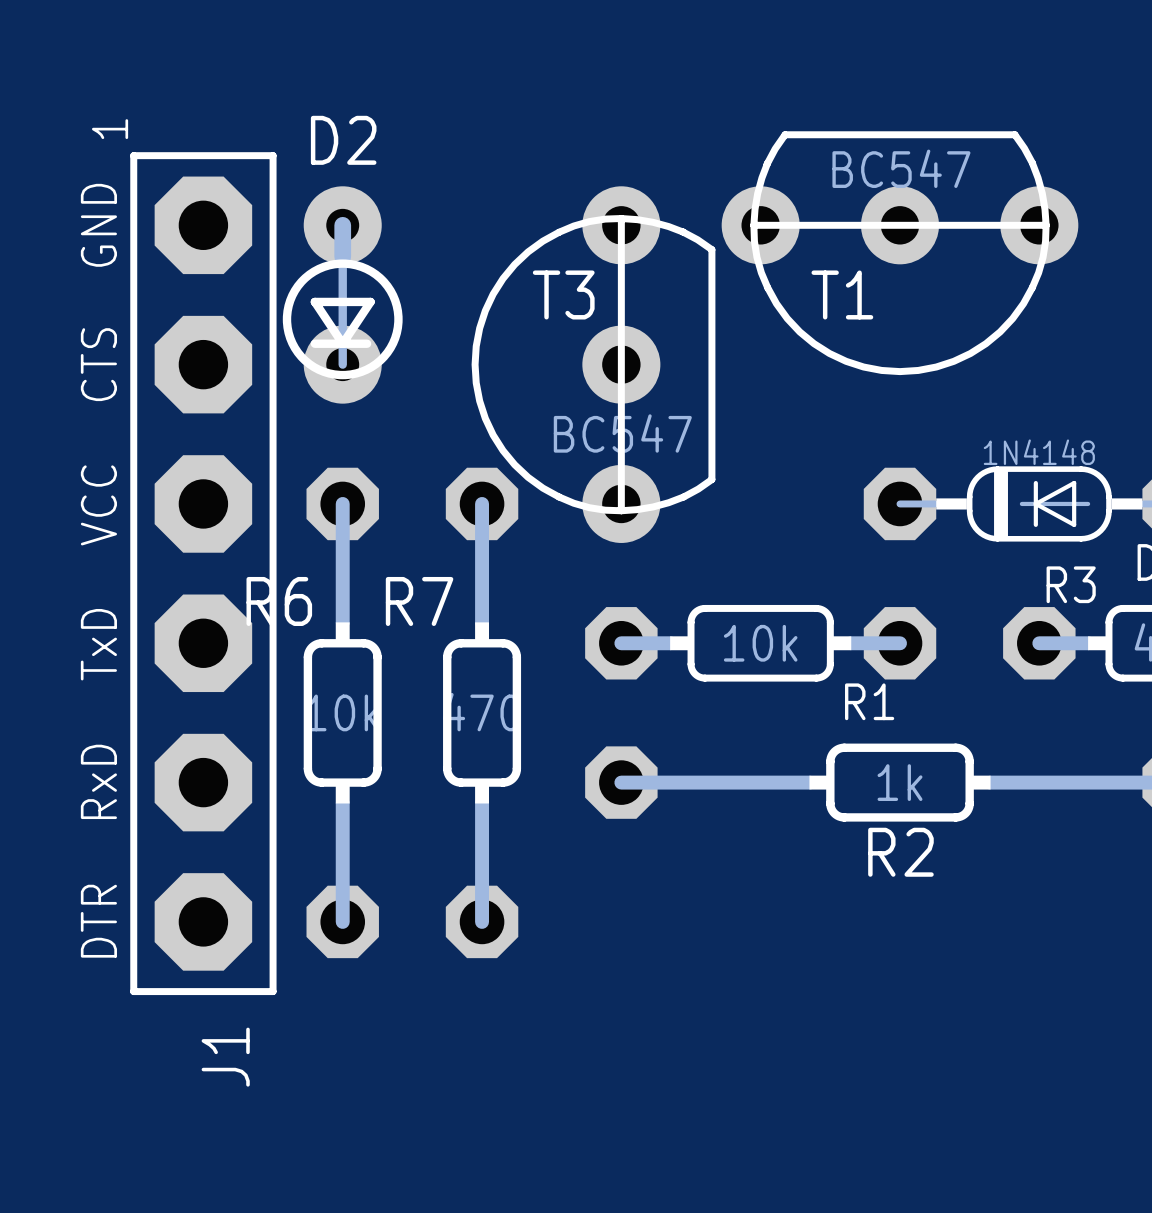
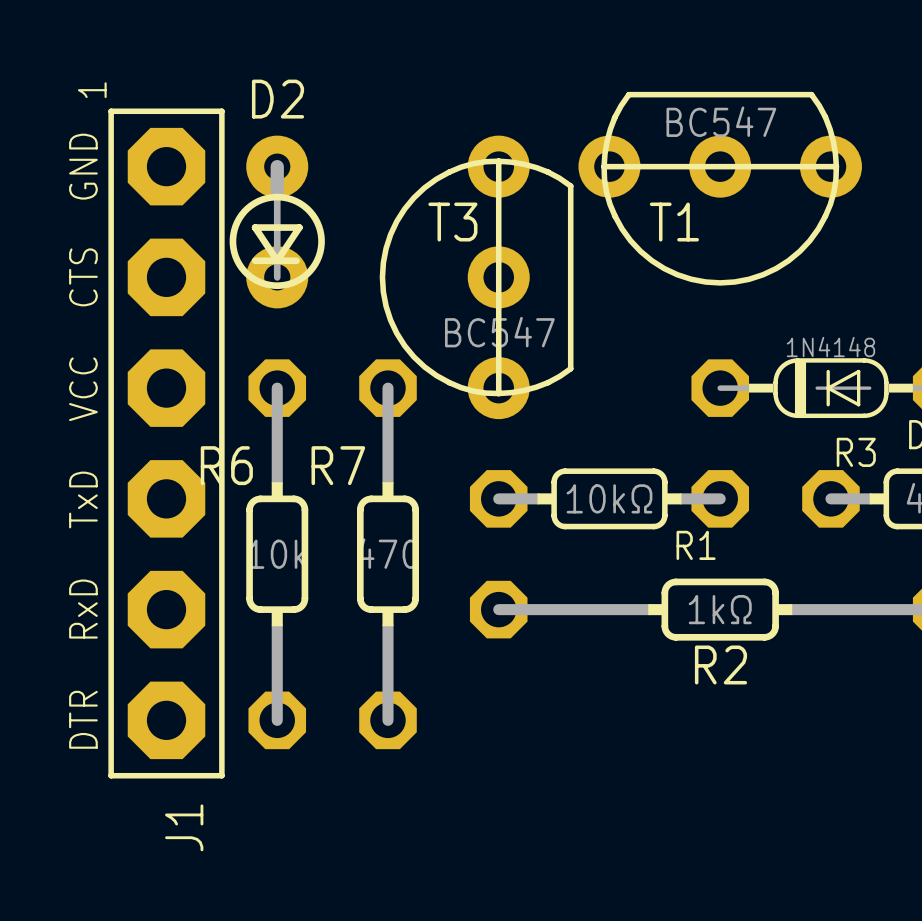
R1 value: 10k (760, 643) -> 10kΩ (609, 498)
R2 value: 1k (900, 782) -> 1kΩ (720, 609)

